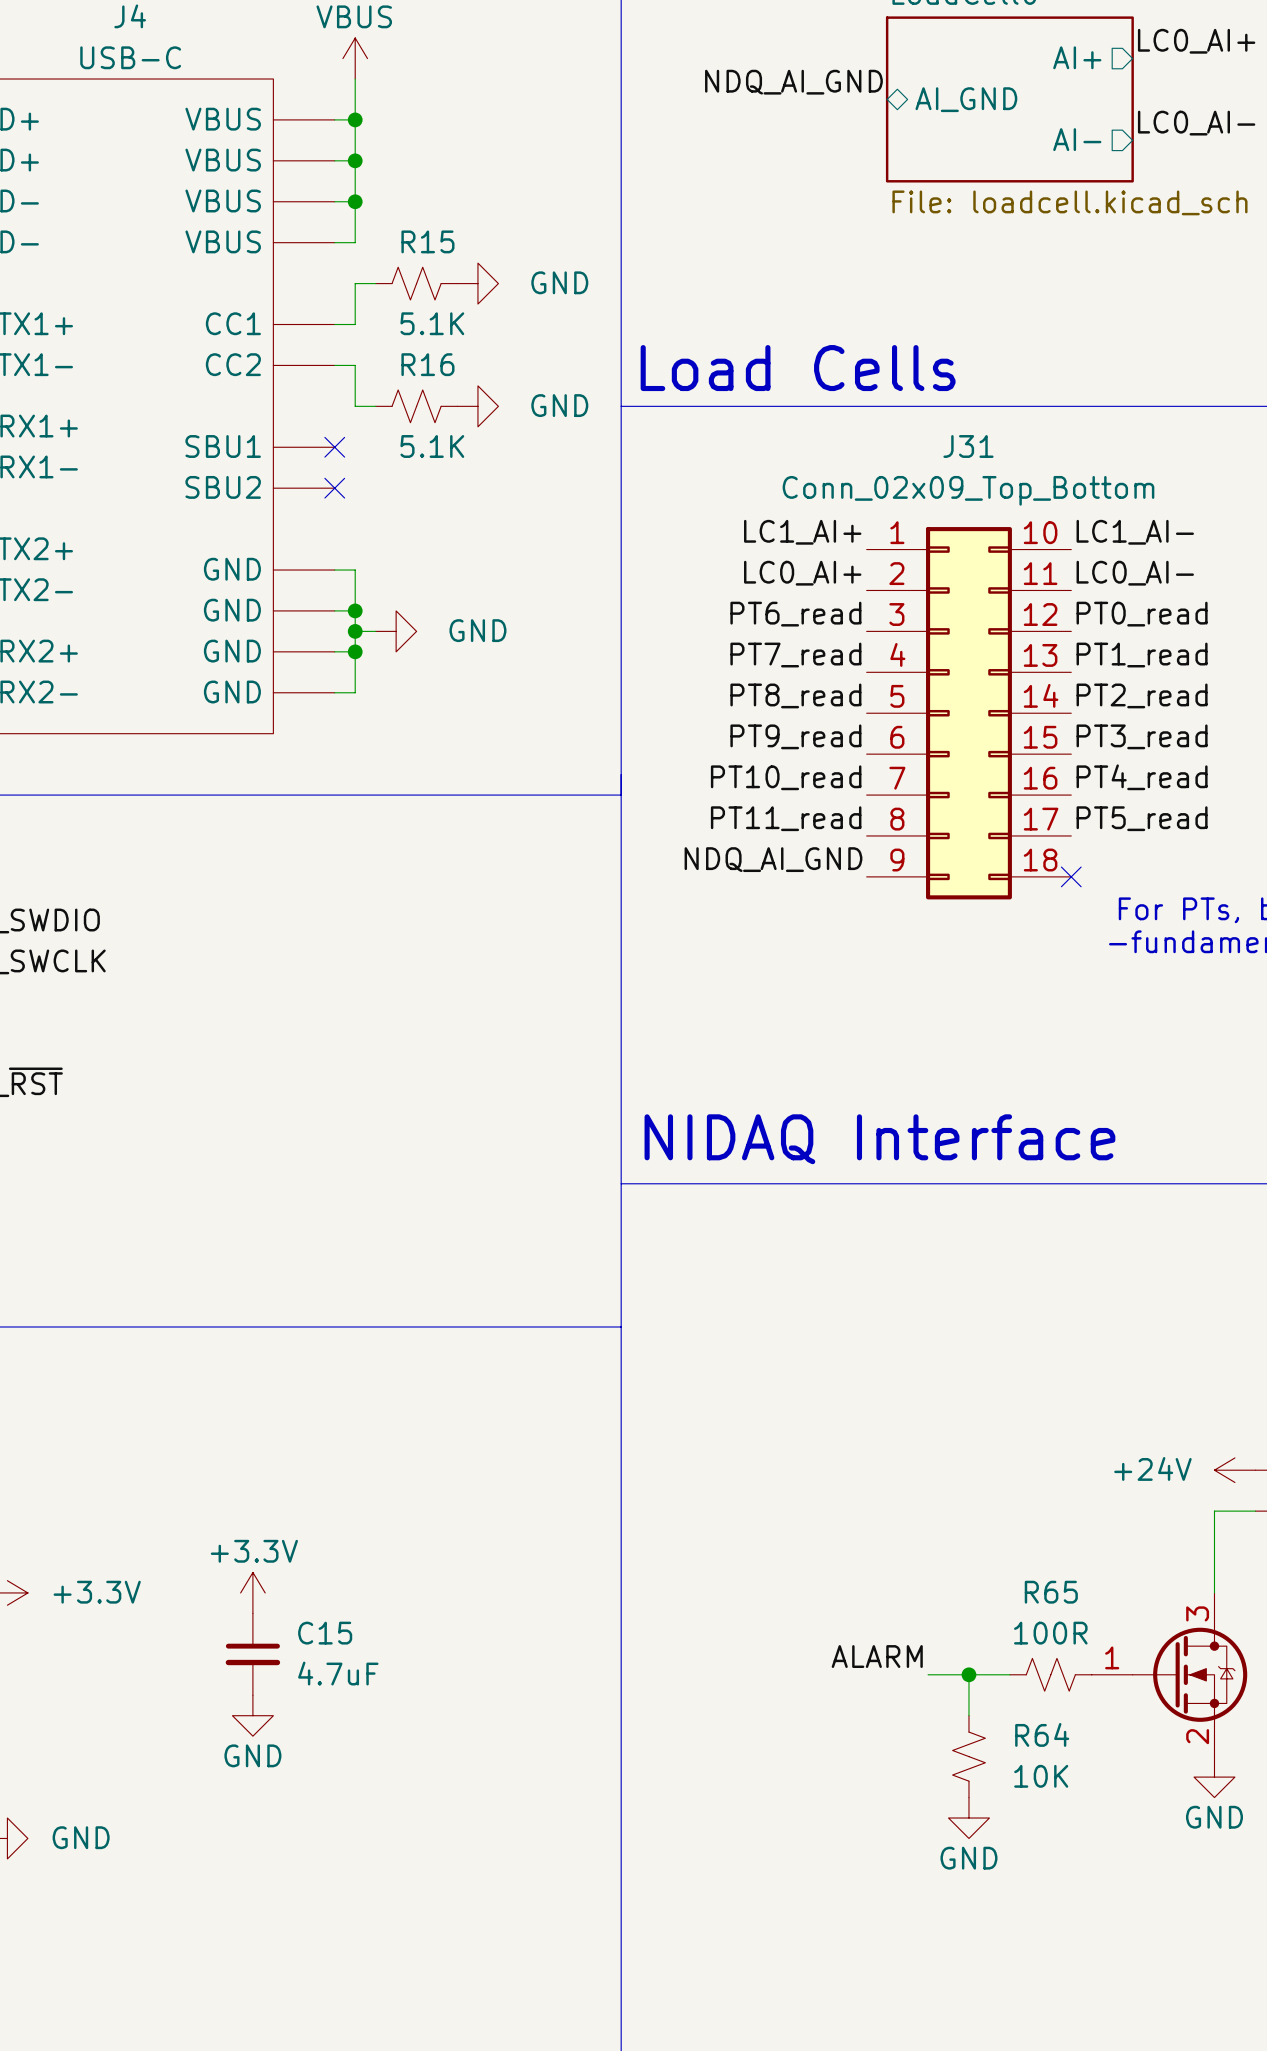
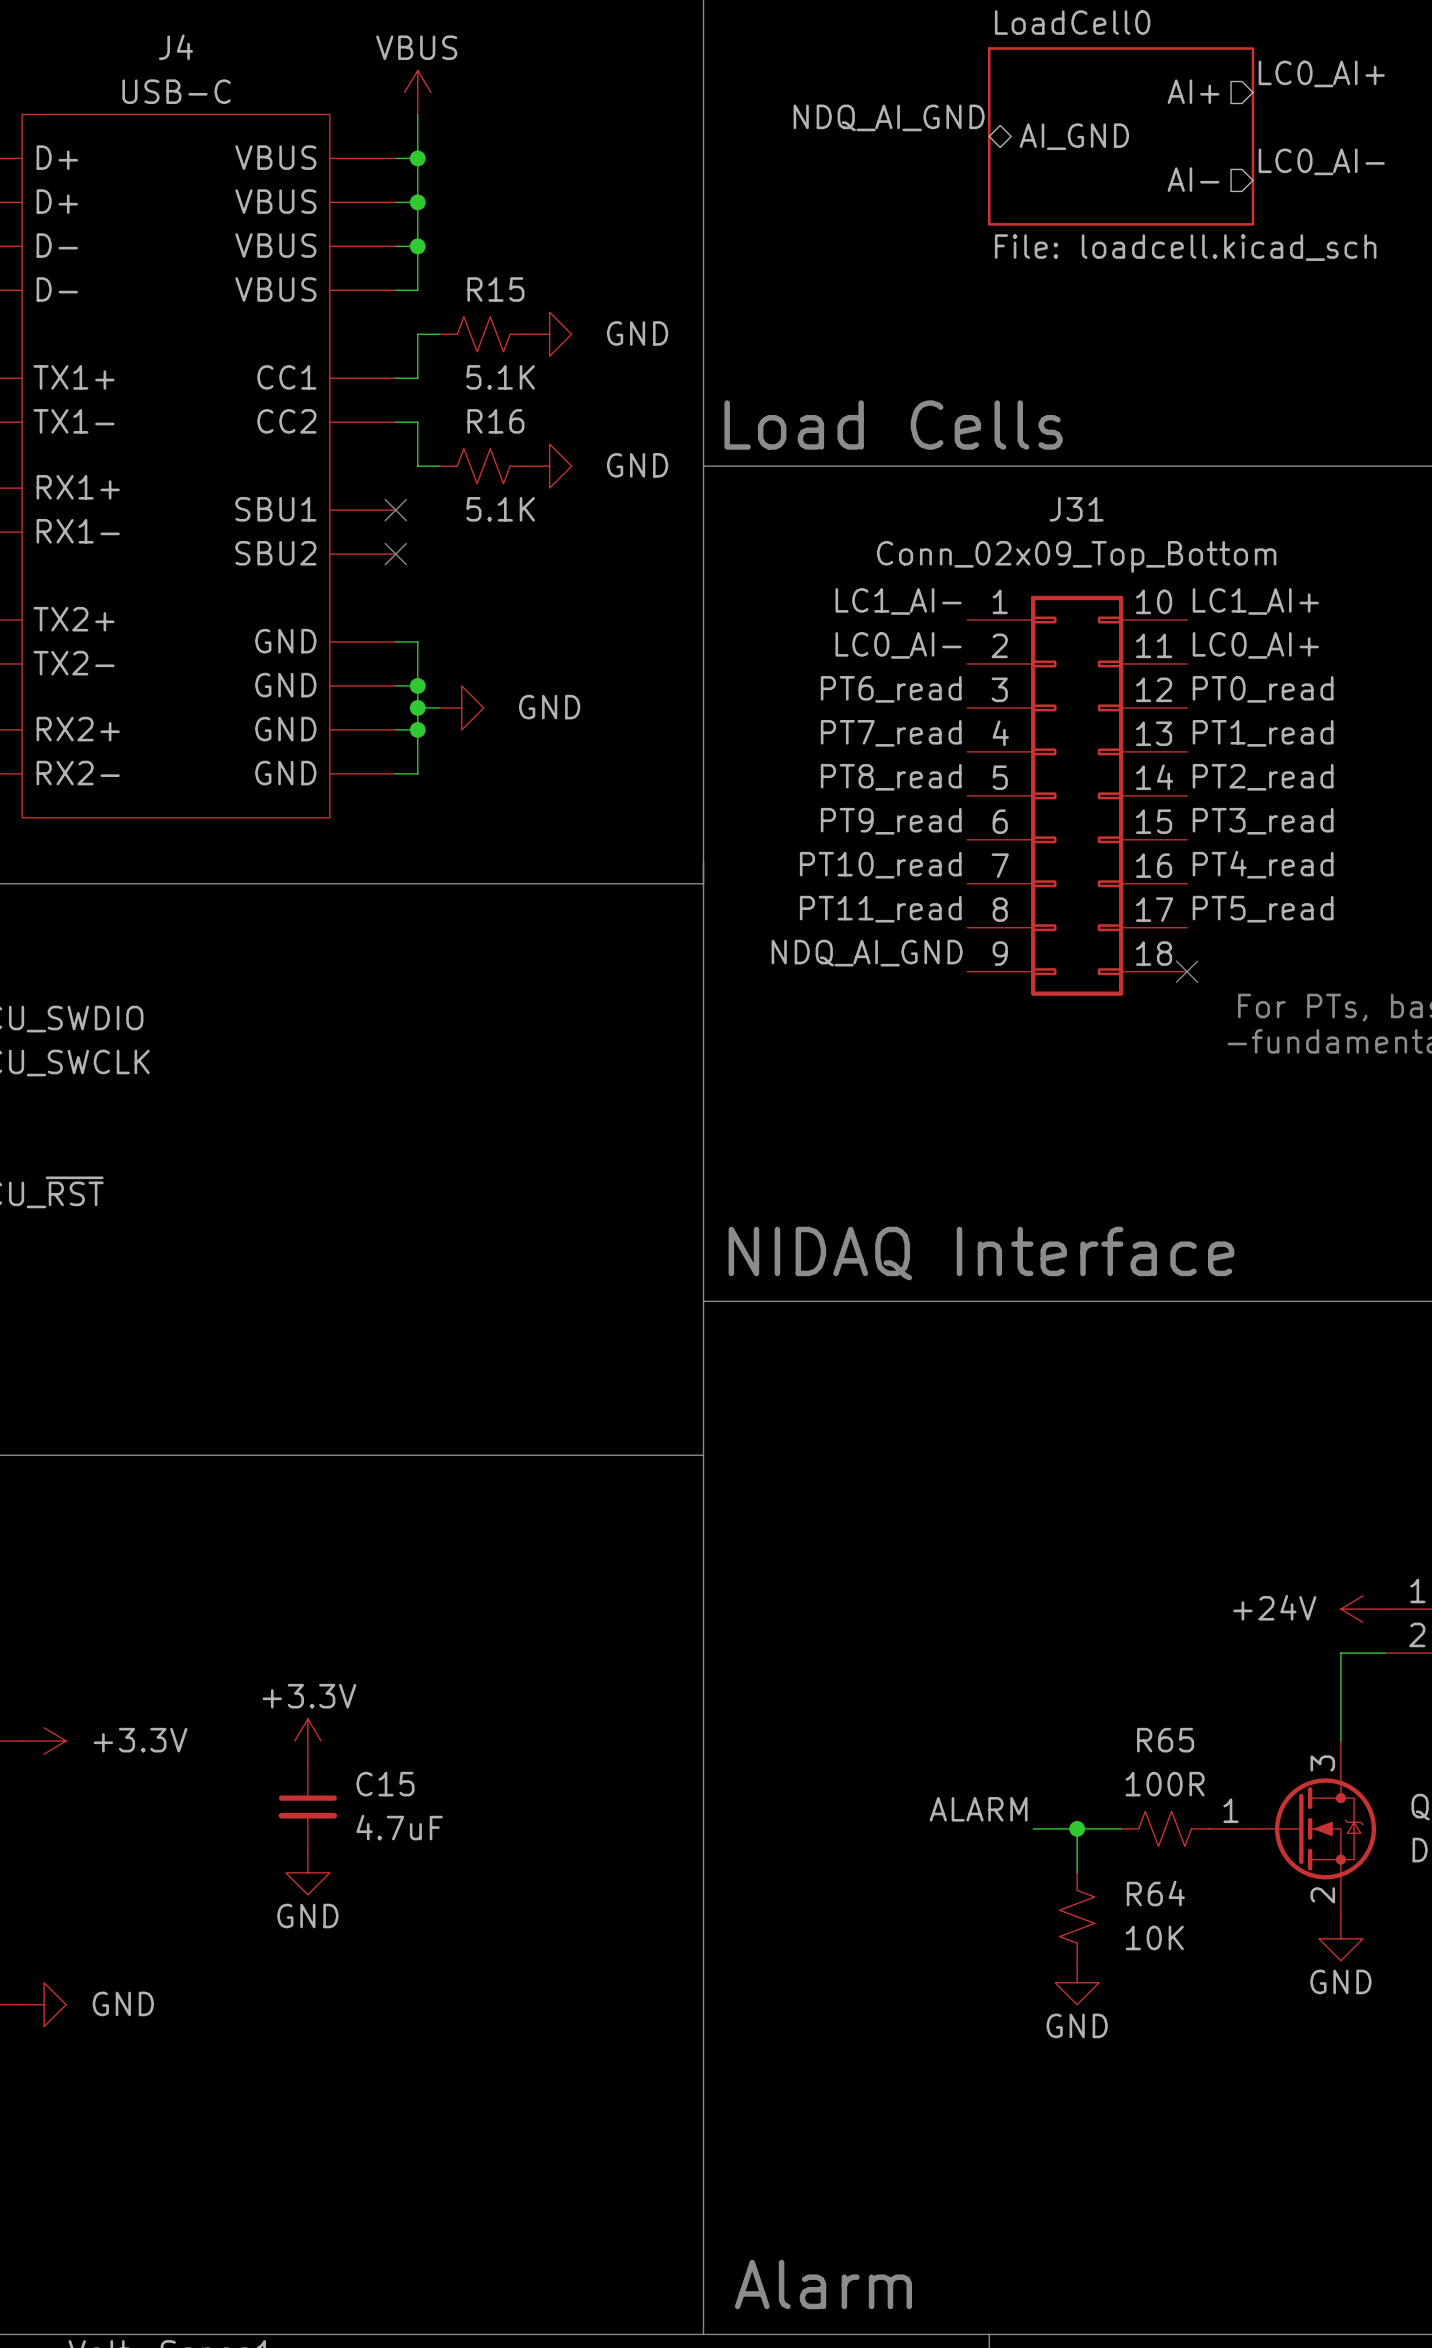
label: LC1_AI+ (802, 532) -> LC1_AI- (898, 601)
label: LC1_AI- (1135, 532) -> LC1_AI+ (1255, 601)
label: LC0_AI+ (802, 573) -> LC0_AI- (898, 645)
label: LC0_AI- (1135, 573) -> LC0_AI+ (1255, 645)

